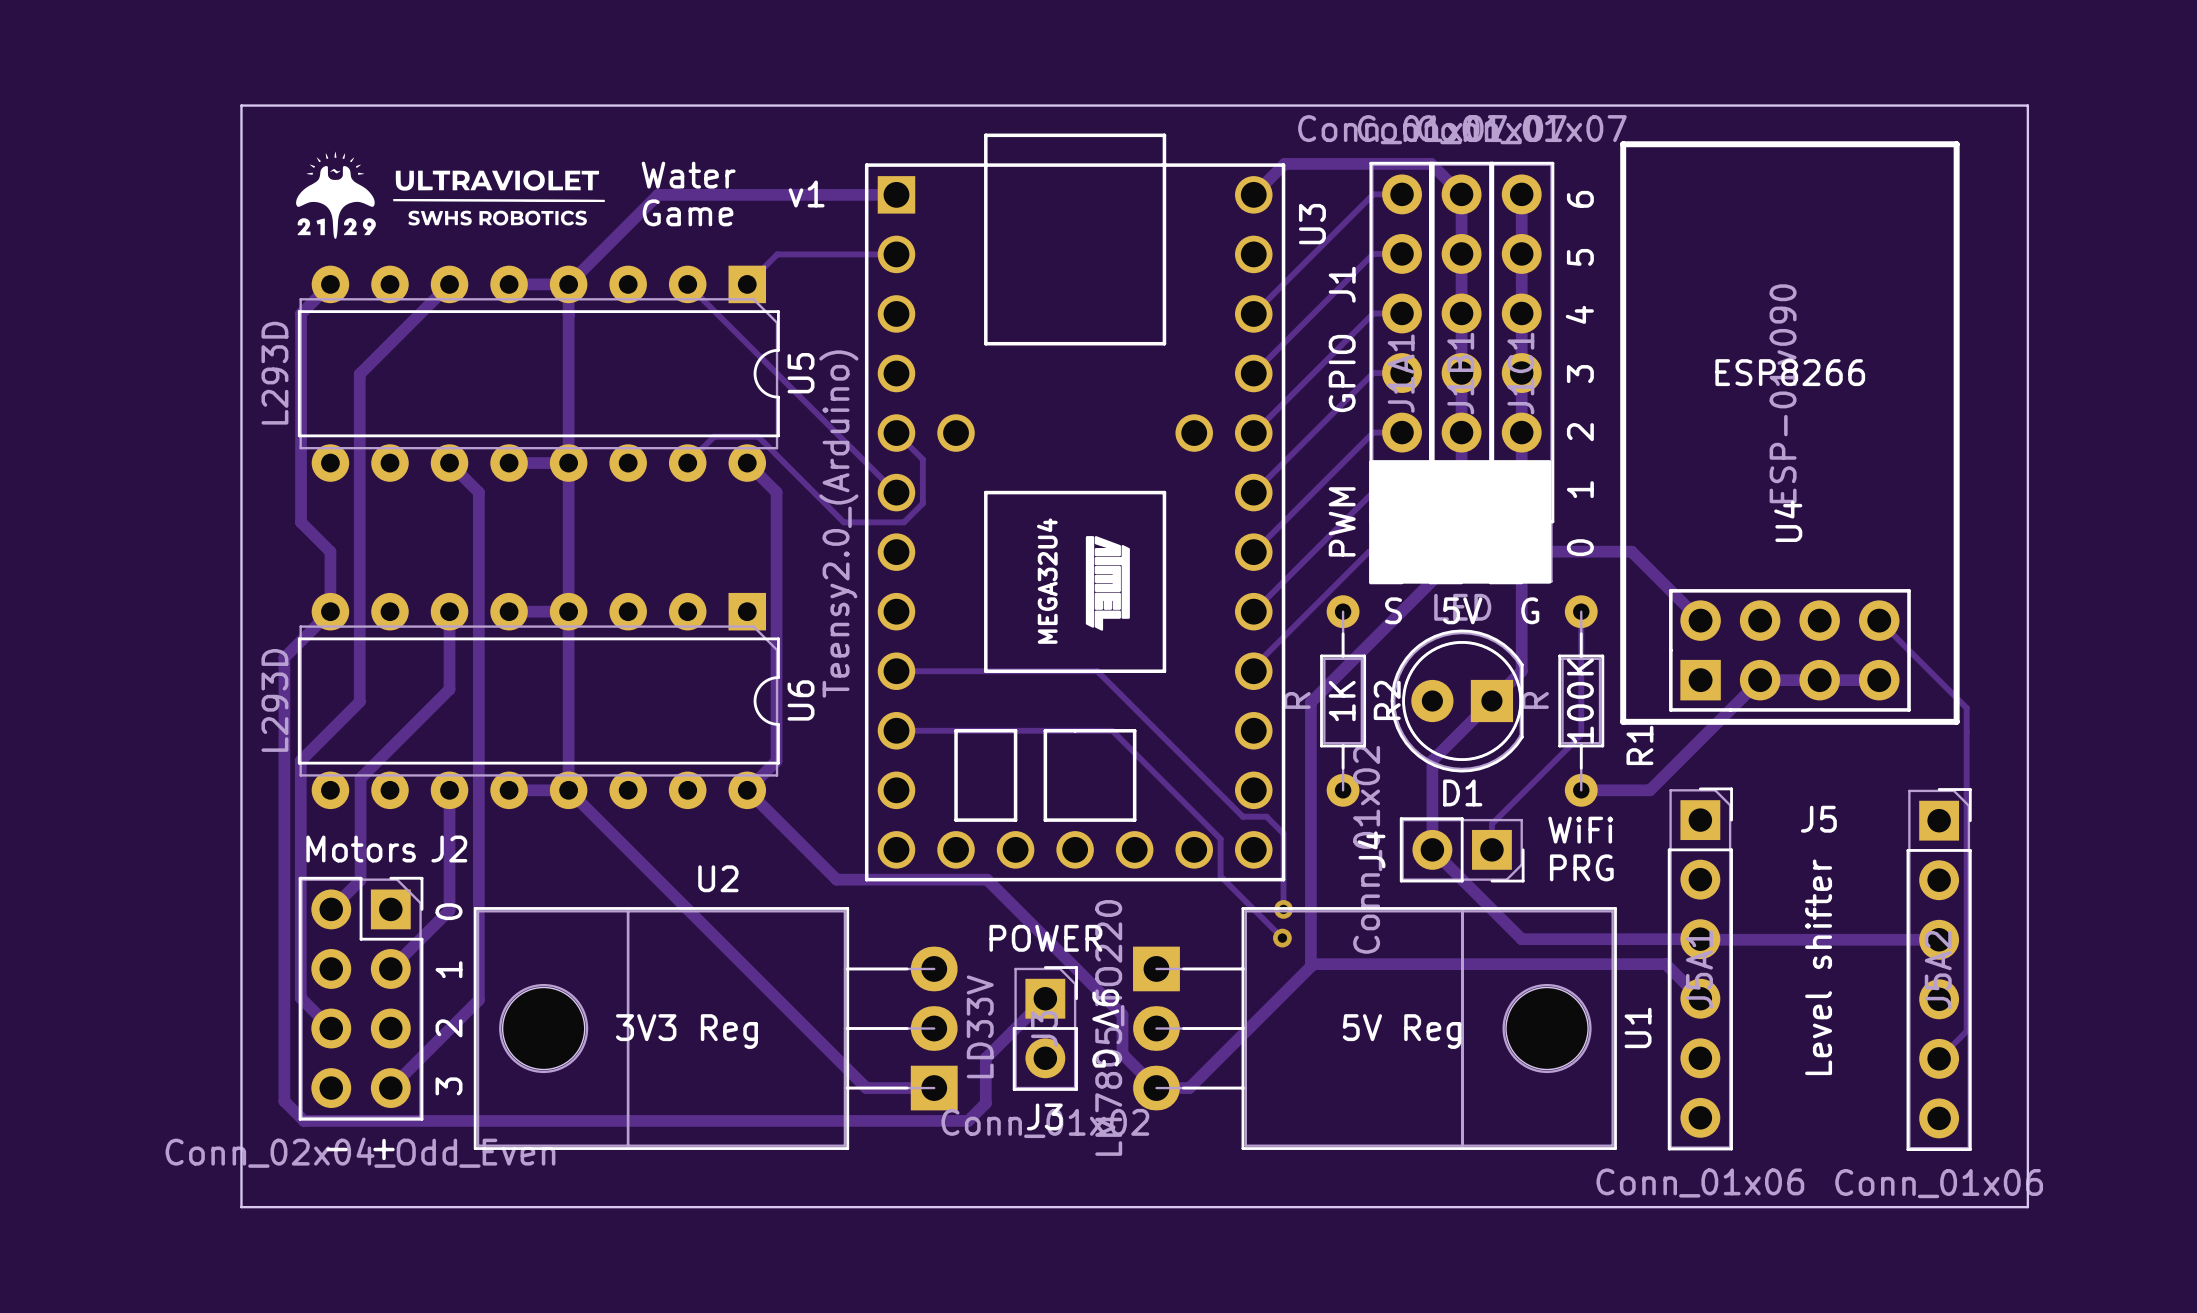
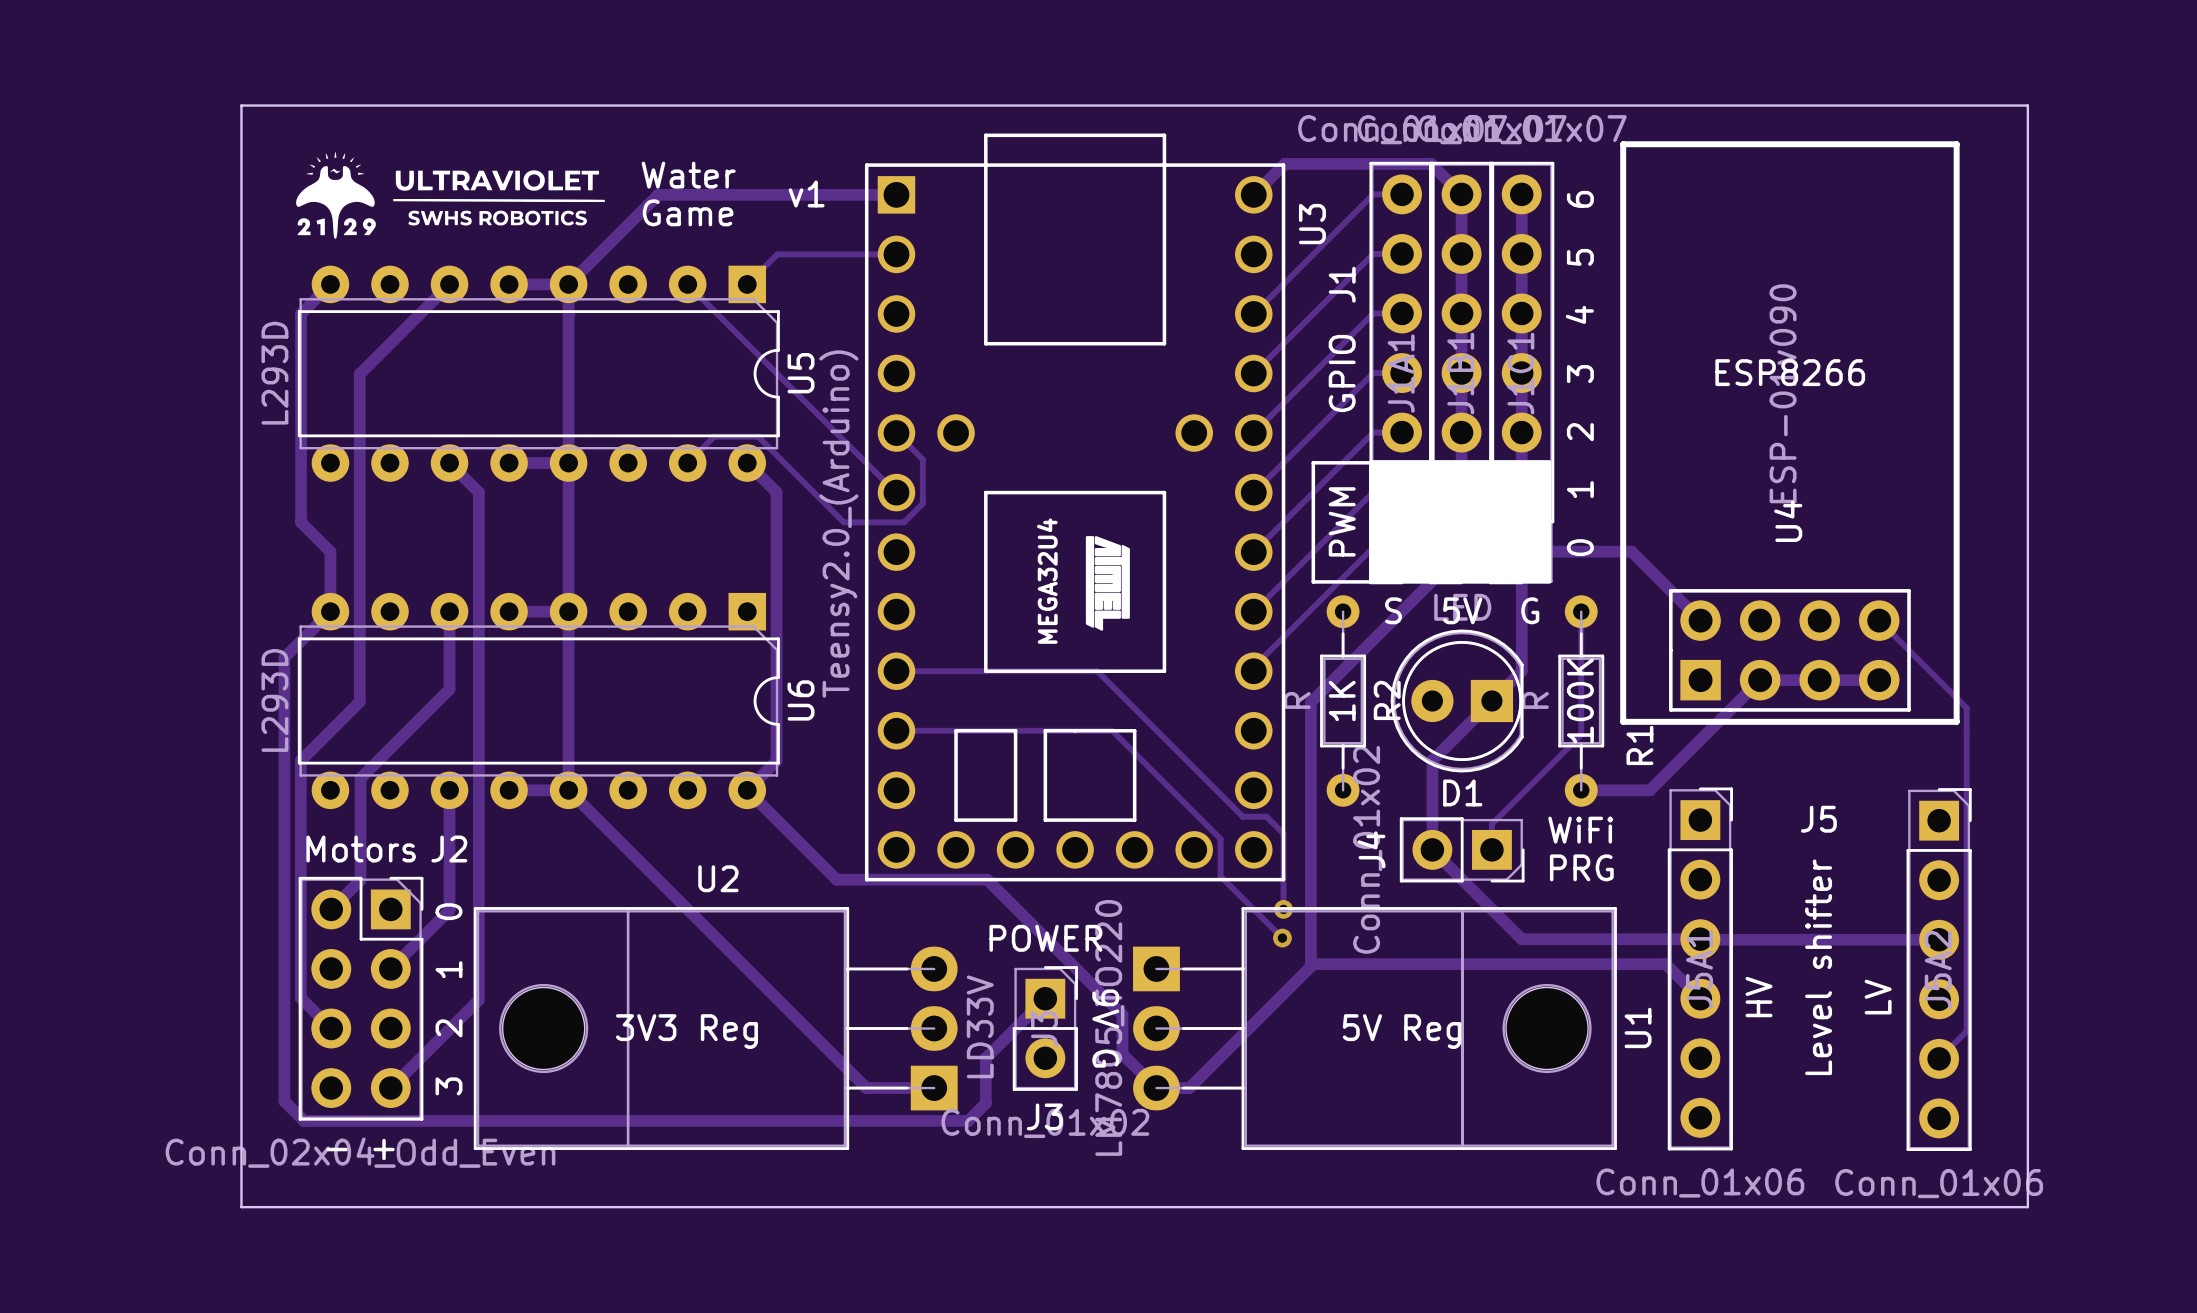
line: none -> (1313, 462) (1370, 462) (1370, 581) (1313, 581) (1313, 462)
text: none -> HV (1759, 997)
text: none -> LV (1878, 997)

